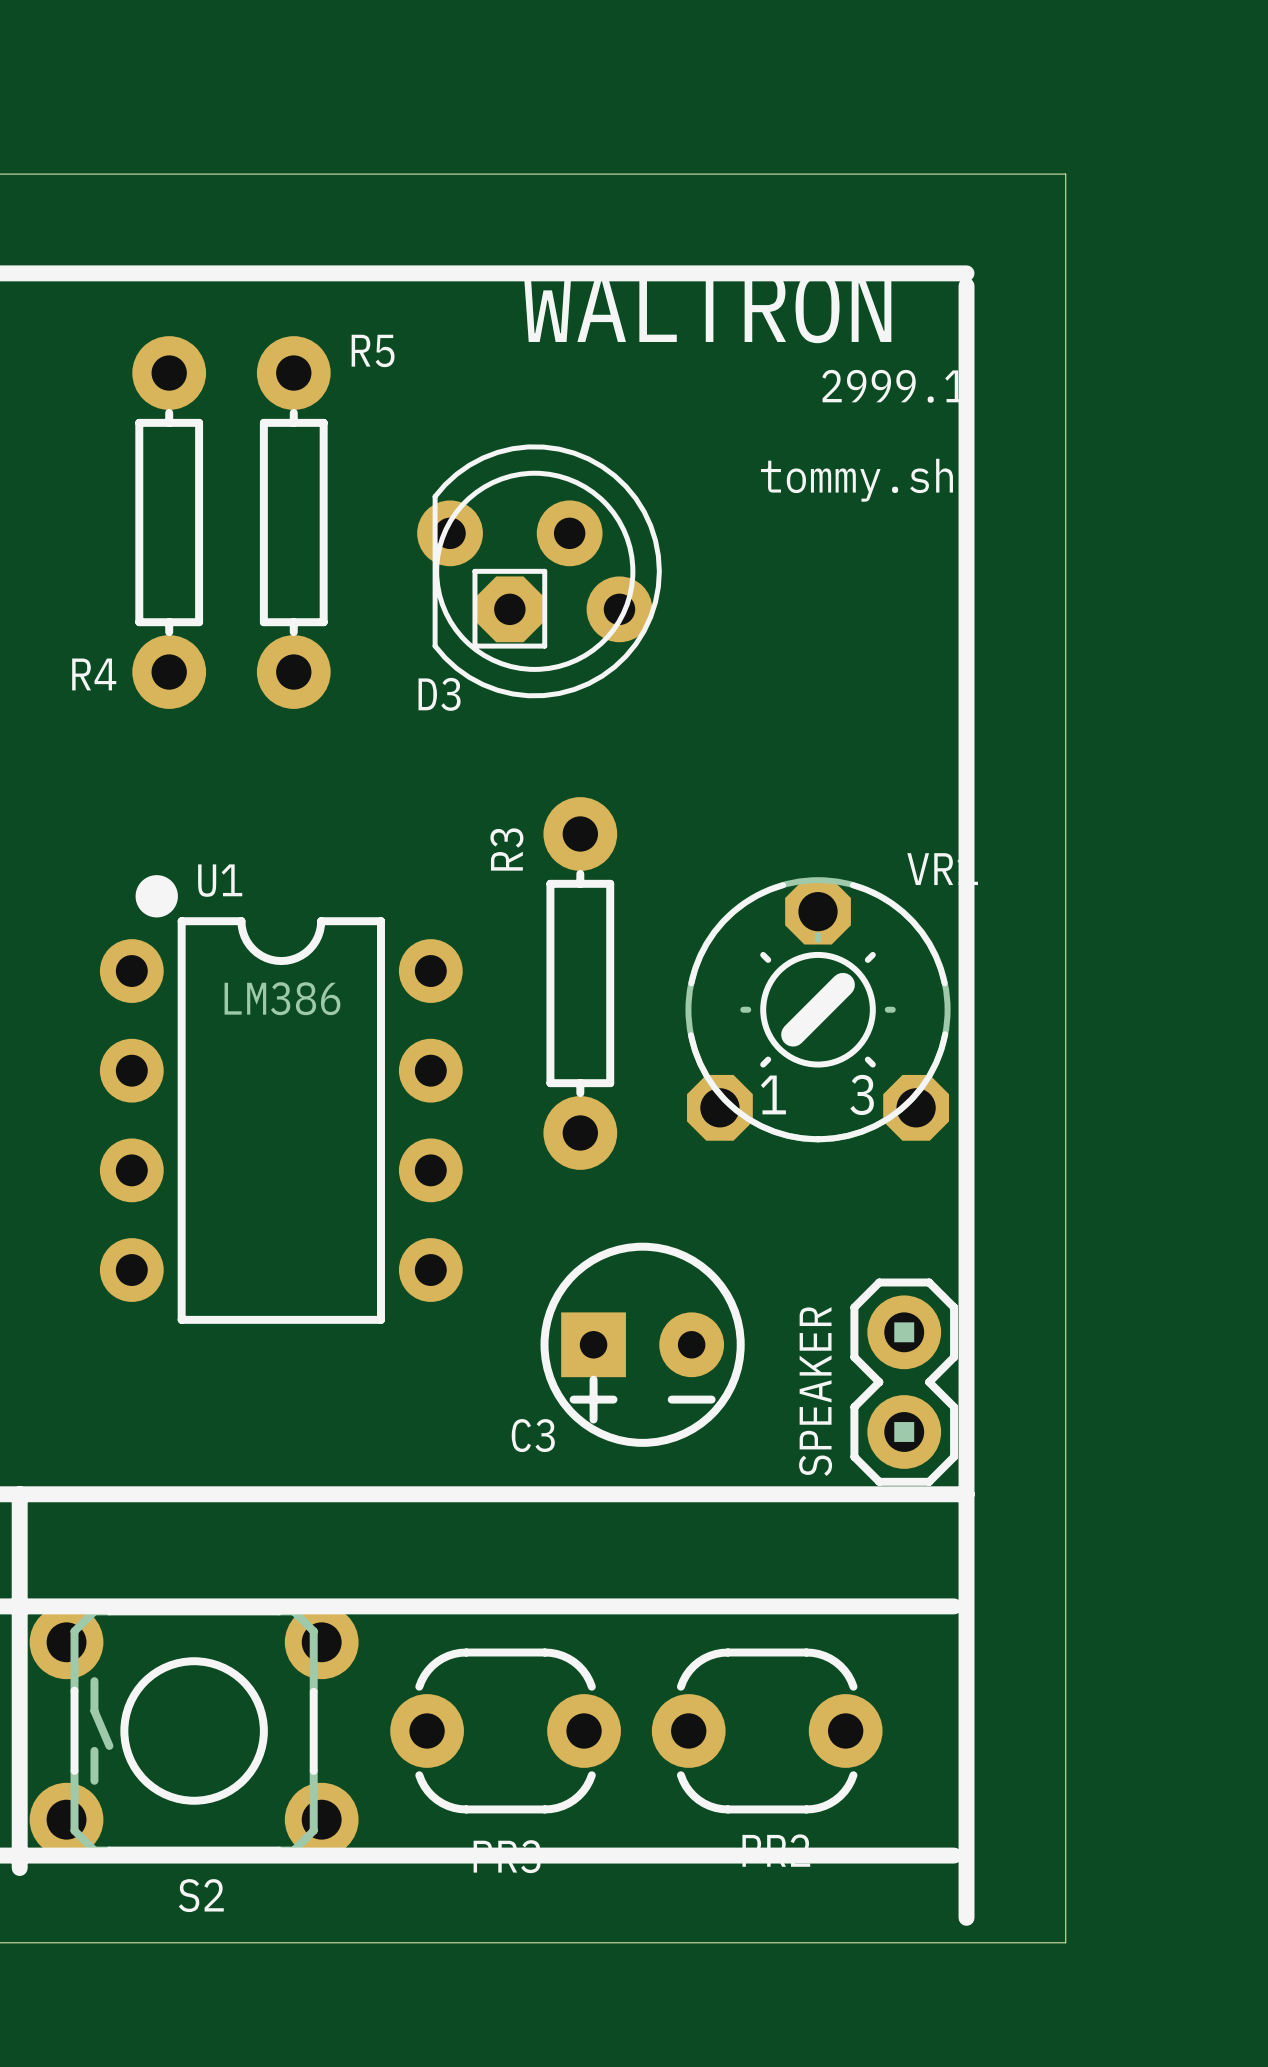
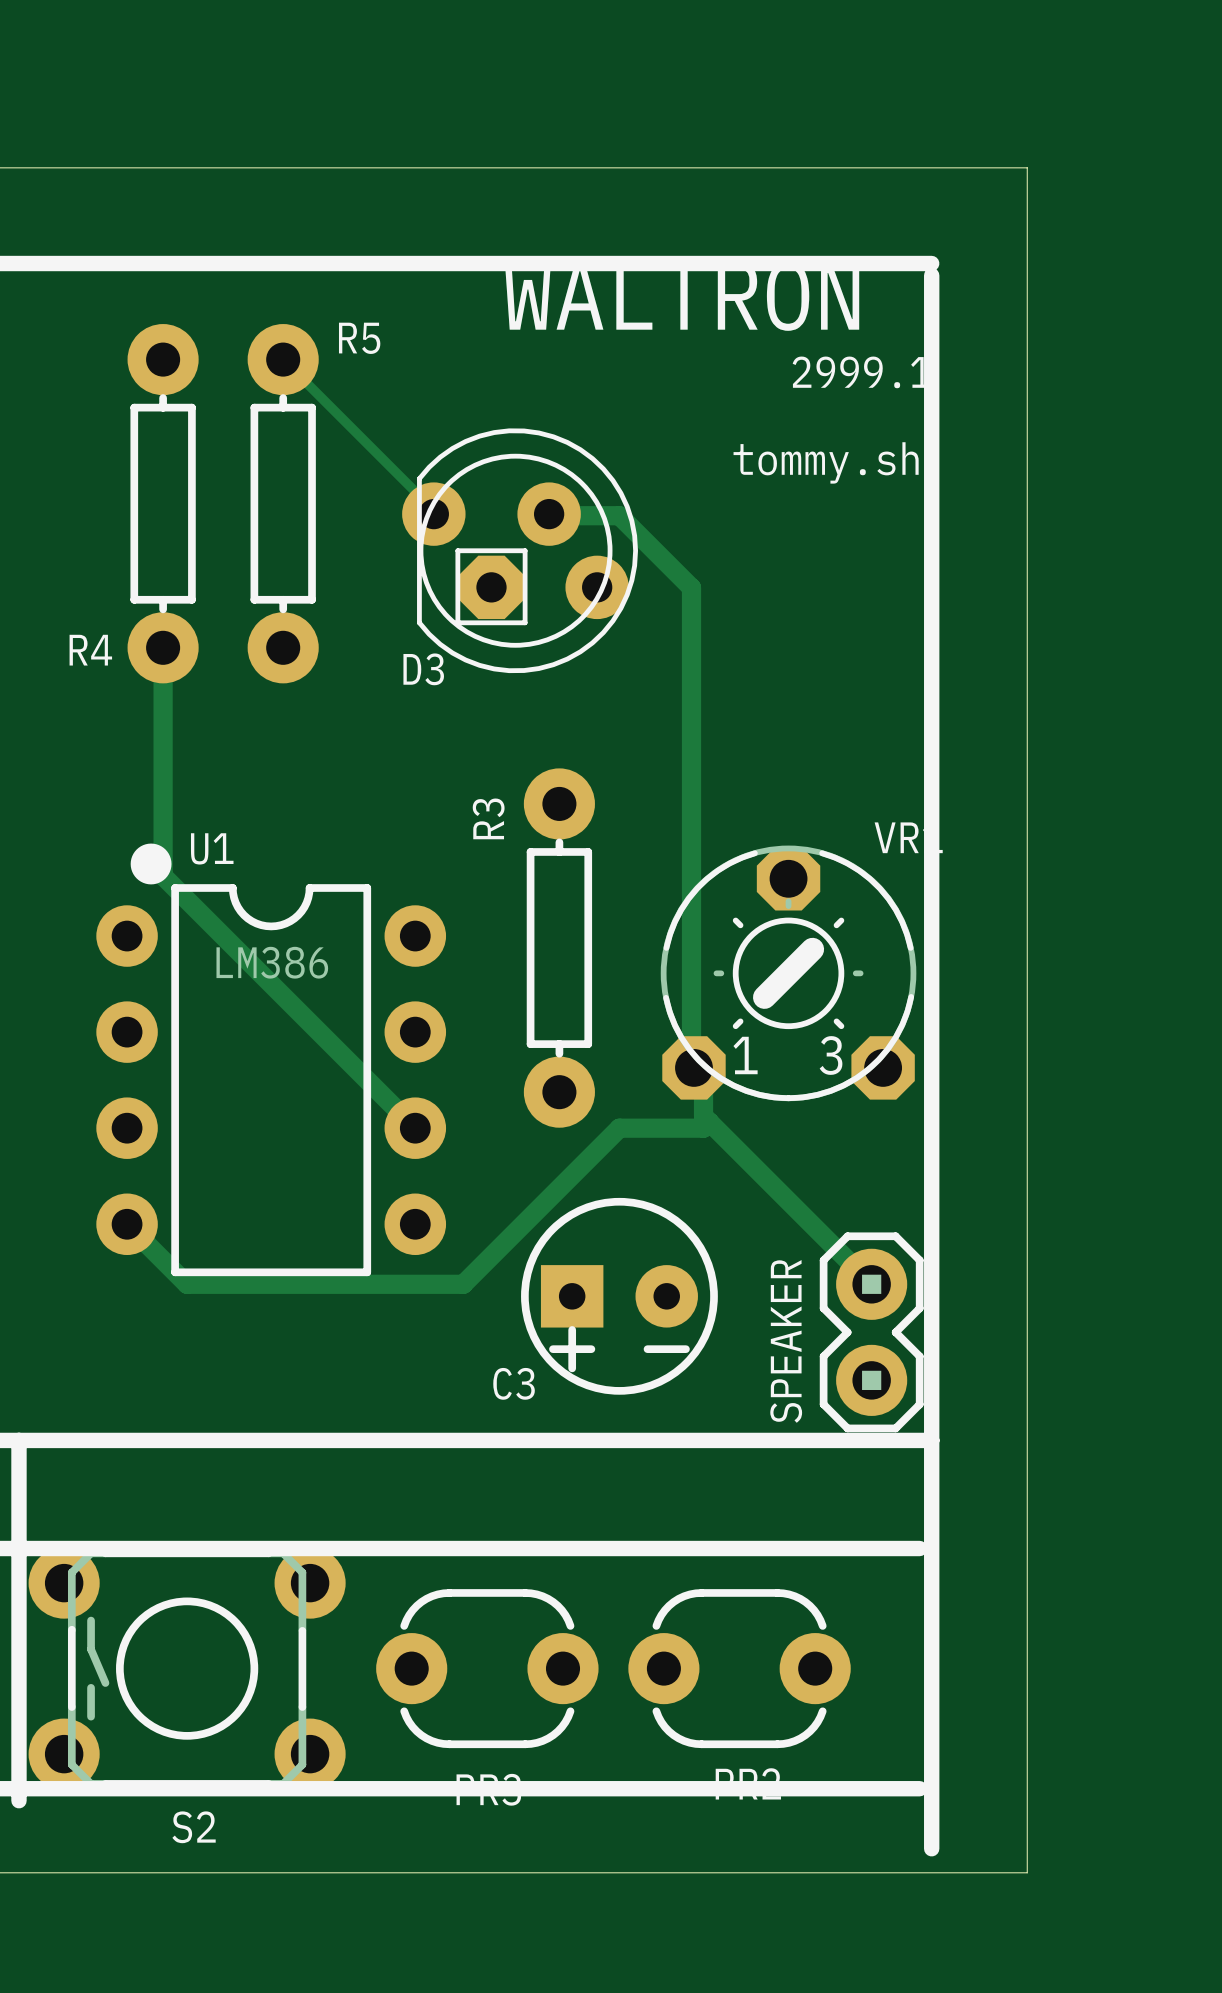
track: none -> (283, 359) (427, 503) (433, 514)
track: none -> (549, 514) (619, 515) (691, 587) (691, 1056) (693, 1067) (703, 1068) (703, 1116) (871, 1284)
track: none -> (163, 647) (163, 875) (415, 1128)
track: none -> (709, 1122) (703, 1128) (619, 1128) (463, 1284) (187, 1284) (127, 1224)

